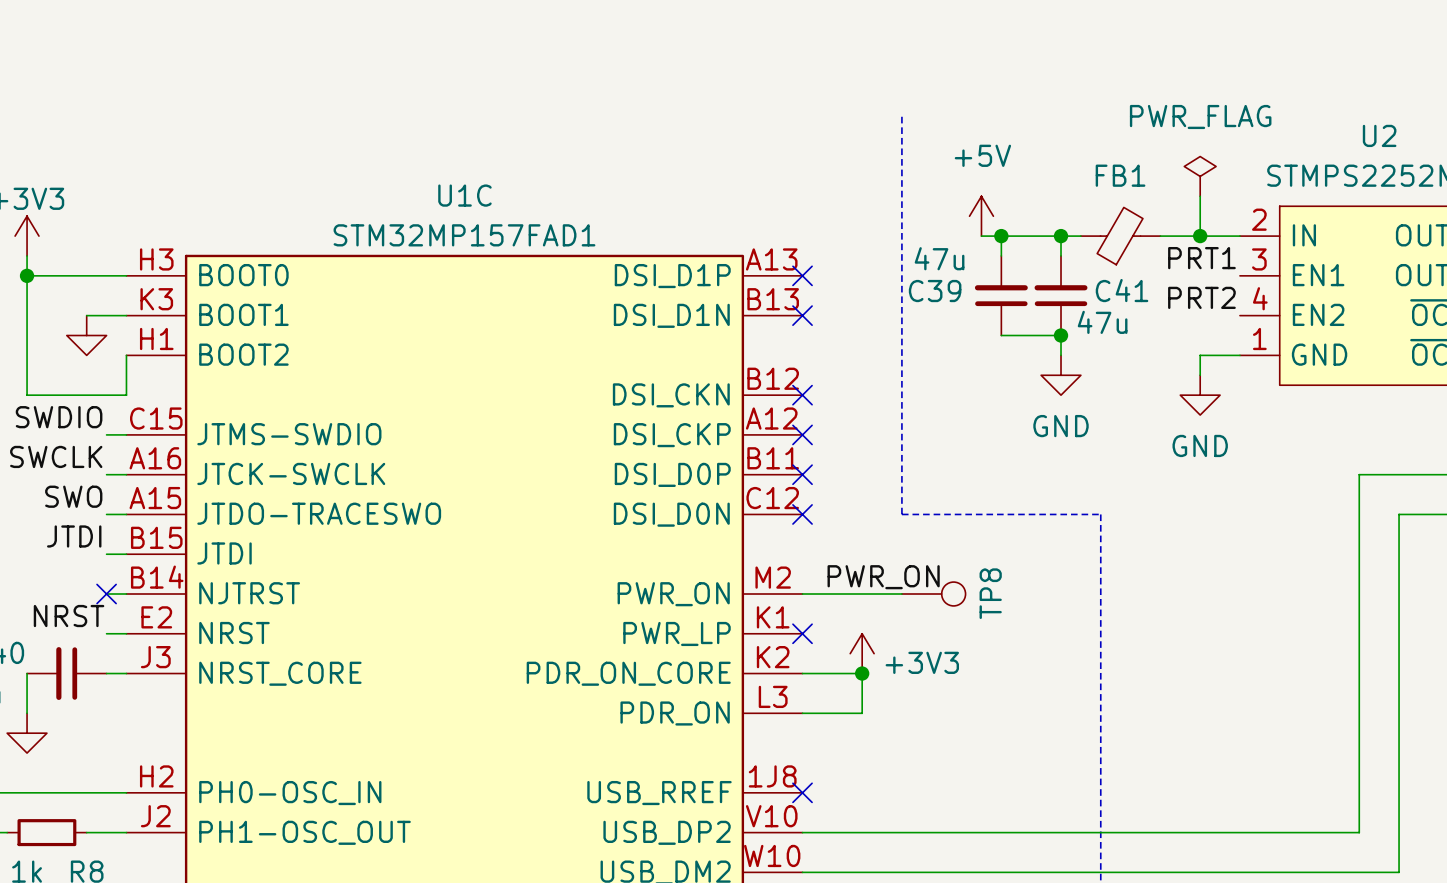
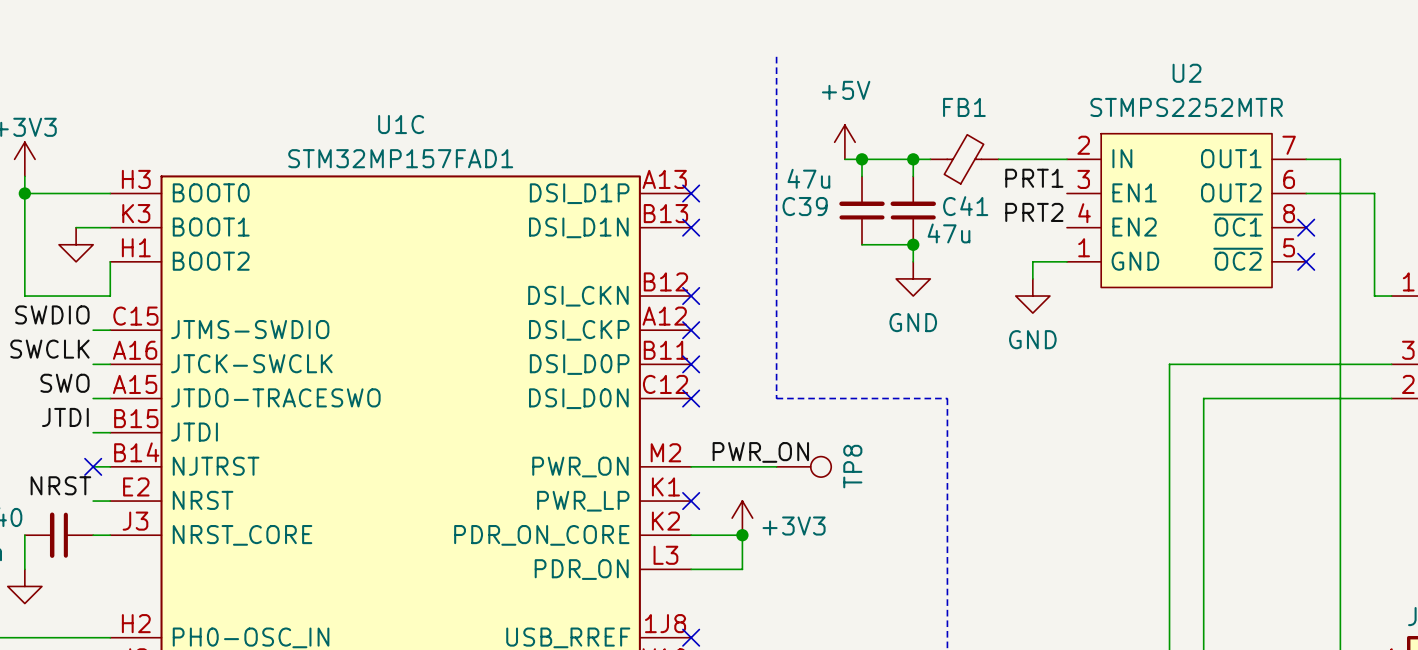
power symbol: PWR_FLAG (1200, 176) -> none
wire: (1200, 196) (1200, 236) -> none
junction: (1200, 236) -> none

